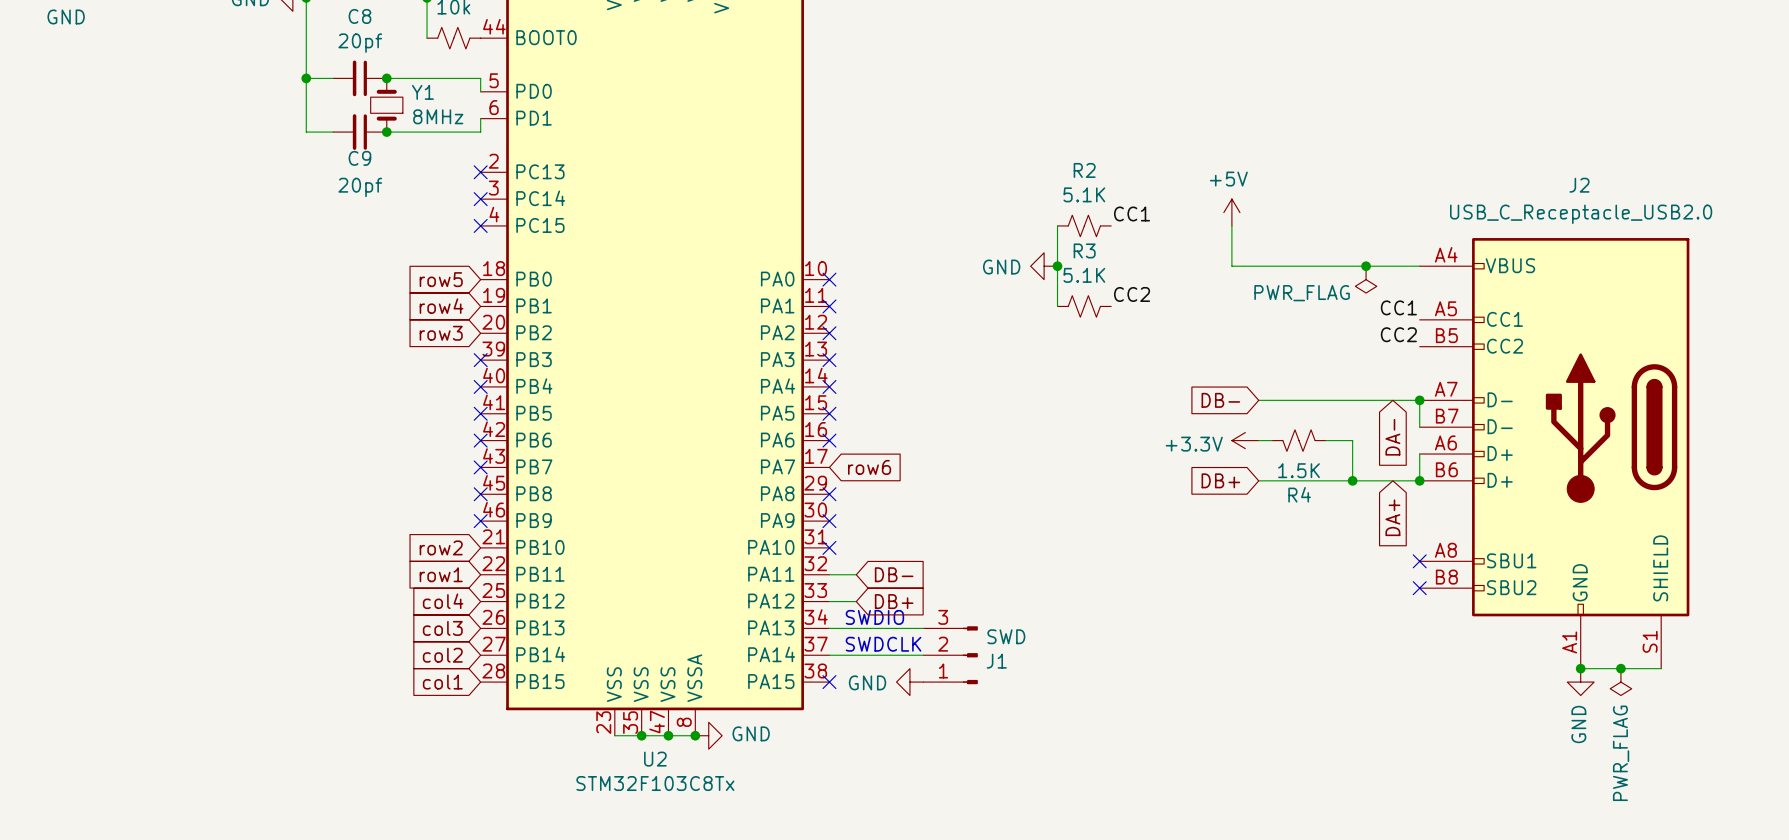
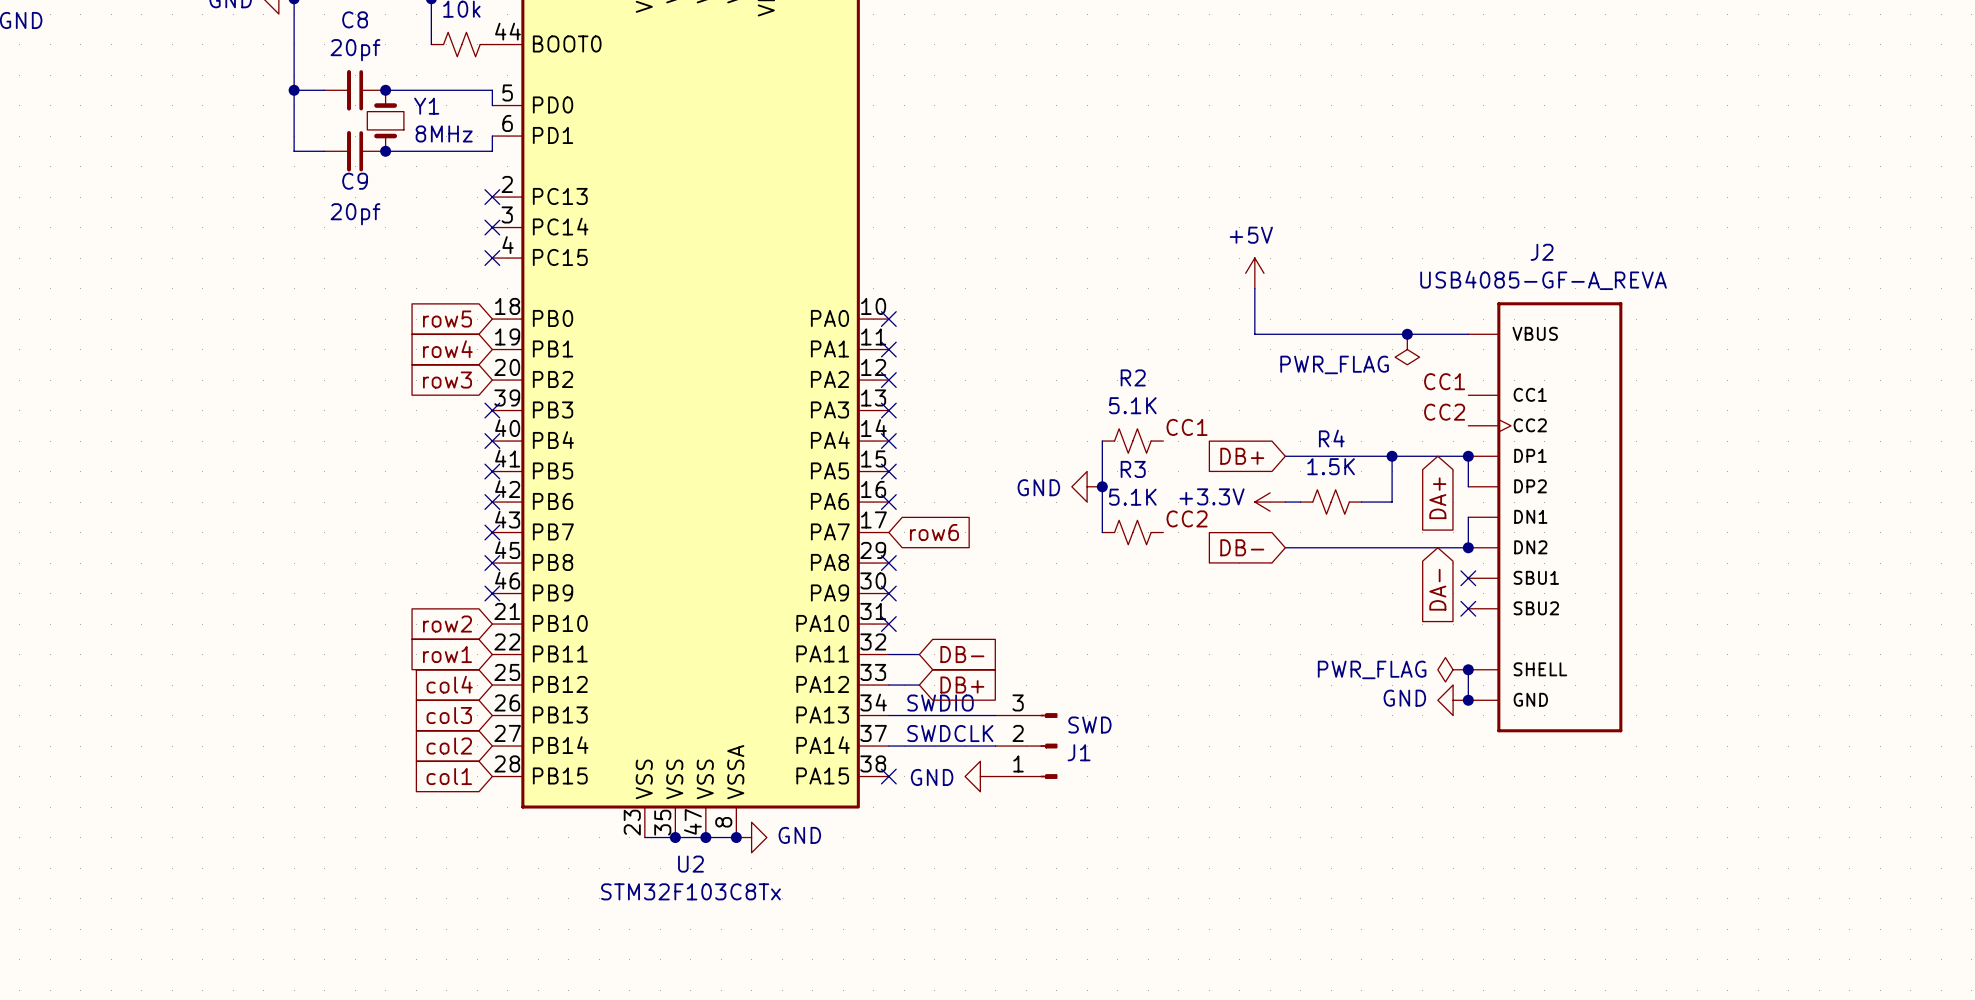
J2 name position: J2 (1579, 185) -> J2 (1542, 252)
power symbol position: +5V (1231, 212) -> +5V (1254, 273)
label: CC1 (1132, 213) -> none
J2 value: USB_C_Receptacle_USB2.0 (1581, 214) -> USB4085-GF-A_REVA (1543, 280)
wire: (1057, 225) (1057, 306) -> (1102, 441) (1102, 532)
R2 position: (1084, 225) -> (1132, 441)
wire: (1231, 225) (1231, 266) (1419, 266) -> (1254, 288) (1254, 334) (1468, 334)
J2 symbol: [1419, 238, 1690, 669] -> [1468, 302, 1623, 733]
power symbol position: GND (1044, 266) -> GND (1087, 486)
junction: (1057, 266) -> none
junction: (1366, 266) -> none
power symbol position: PWR_FLAG (1366, 279) -> PWR_FLAG (1407, 349)
junction: none -> (1407, 334)
label: CC2 (1132, 294) -> none
R3 position: (1084, 306) -> (1132, 532)
label position: CC1 (1398, 307) -> CC1 (1444, 381)
label position: CC2 (1398, 334) -> CC2 (1444, 412)
label: none -> CC1 (1187, 427)
wire: none -> (1285, 456) (1376, 456)
global label position: DB- (1220, 400) -> DB- (1242, 547)
wire: none -> (1392, 456) (1392, 502)
junction: none -> (1392, 456)
wire: (1339, 400) (1419, 400) (1419, 427) -> (1468, 456) (1468, 486)
junction: none -> (1468, 456)
junction: (1419, 400) -> none
junction: none -> (1102, 486)
global label position: DA- (1392, 437) -> DA- (1437, 589)
wire: none -> (1285, 502) (1300, 502)
power symbol position: +3.3V (1245, 440) -> +3.3V (1270, 502)
R4 flip: as is (1298, 440) -> left-right (1331, 502)
R4 position: (1298, 440) -> (1331, 502)
wire: (1325, 440) (1352, 440) (1352, 480) -> none
power symbol text position: +3.3V (1194, 444) -> +3.3V (1212, 496)
wire: (1419, 454) (1419, 480) (1339, 480) -> (1468, 517) (1468, 547)
label: none -> CC2 (1187, 518)
R4 value position: 1.5K (1298, 470) -> 1.5K (1331, 466)
wire: none -> (1285, 547) (1376, 547)
global label position: DB+ (1220, 480) -> DB+ (1242, 456)
junction position: (1352, 480) -> (1468, 547)
junction: (1419, 480) -> none
R4 name position: R4 (1299, 494) -> R4 (1331, 438)
no-connect mark: none -> (1468, 578)
global label position: DA+ (1392, 517) -> DA+ (1437, 498)
no-connect mark: none -> (1468, 608)
no-connect mark: (1419, 561) -> none
power symbol: none -> PWR_FLAG (1453, 669)
wire: none -> (1468, 669) (1468, 700)
junction: none -> (1468, 669)
no-connect mark: (1419, 588) -> none
power symbol: none -> GND (1453, 700)
junction: none -> (1468, 700)
wire: (1580, 668) (1661, 668) -> none
junction: (1580, 668) -> none
junction: (1620, 668) -> none
power symbol: GND (1580, 682) -> none
power symbol: PWR_FLAG (1620, 682) -> none

